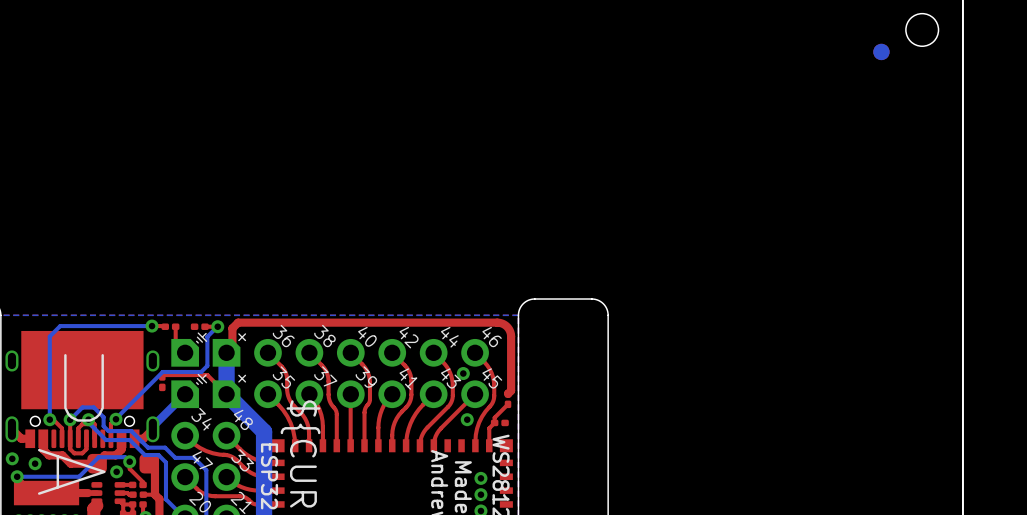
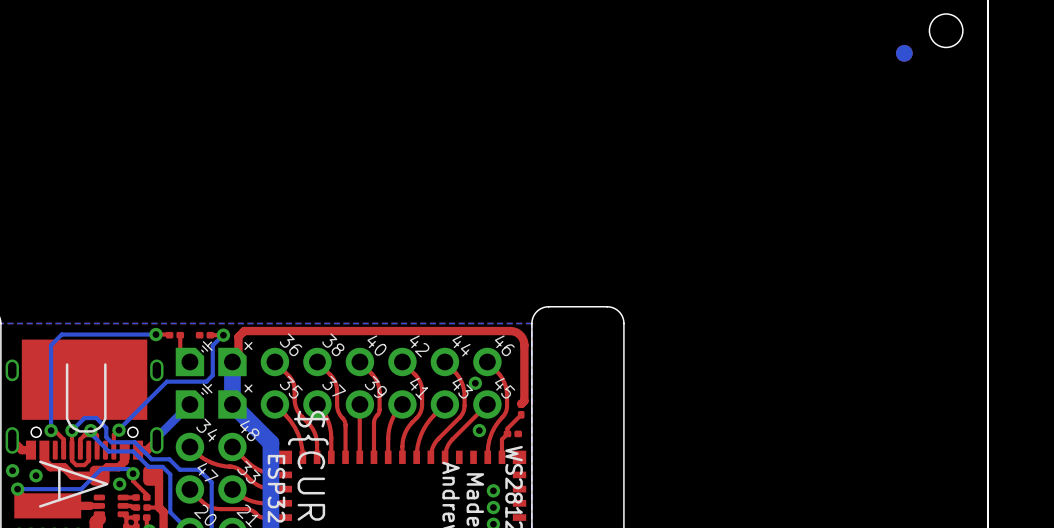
top track: (162, 376) (164, 375) (207, 375) (226, 394) -> none
part: (162, 382) -> none

